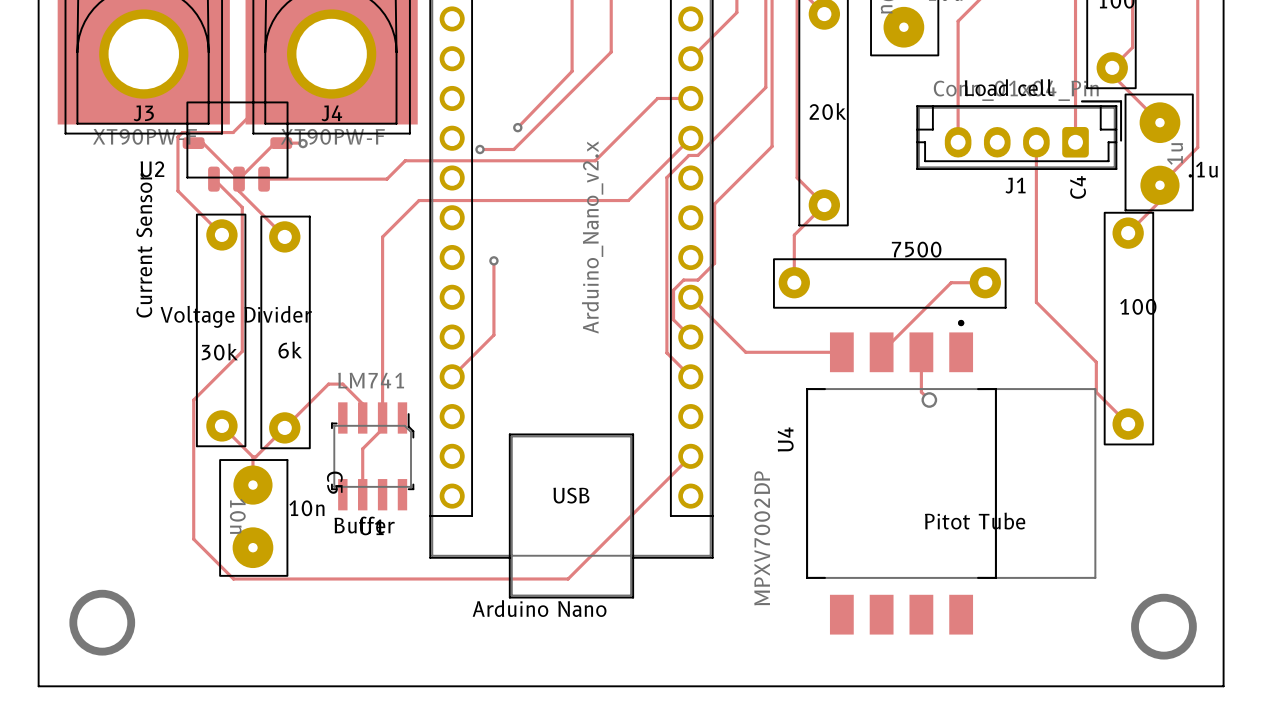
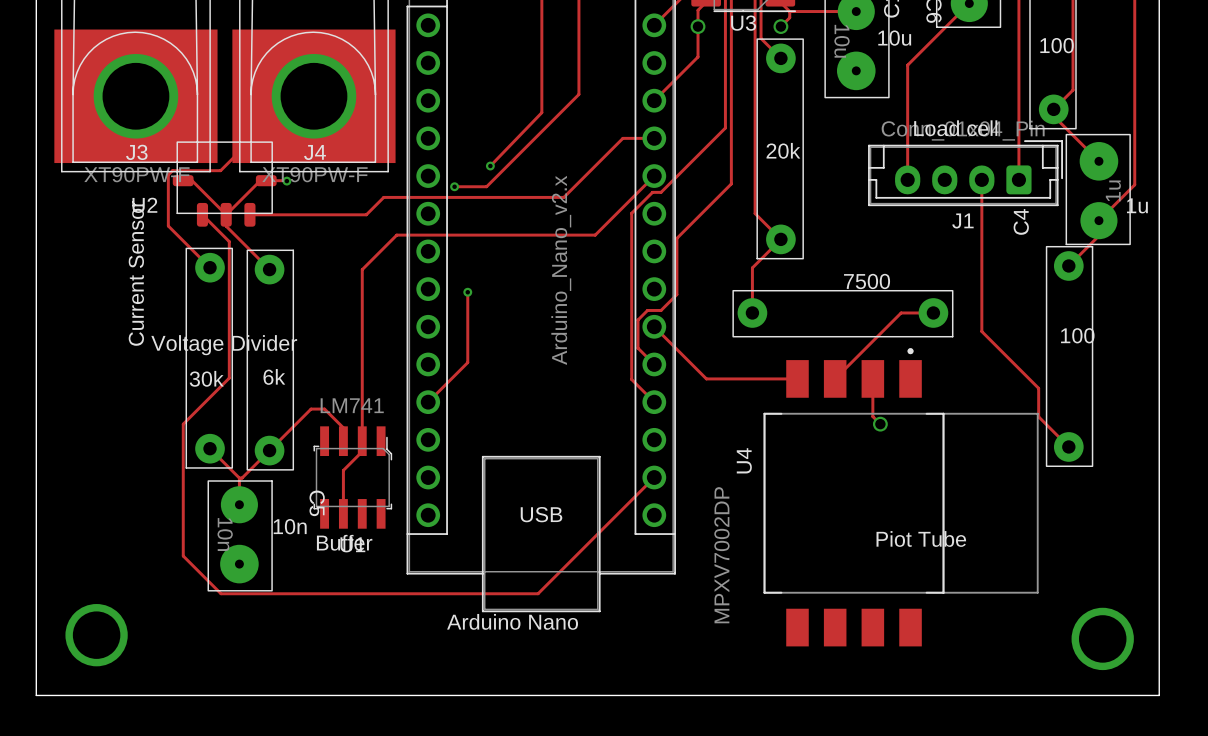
text: .1u (1203, 169) -> 1u (1137, 205)
text: Pitot Tube (975, 521) -> Piot Tube (921, 538)

